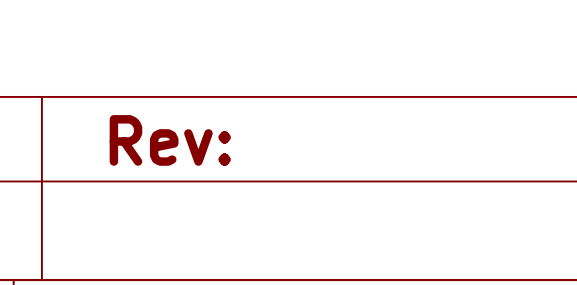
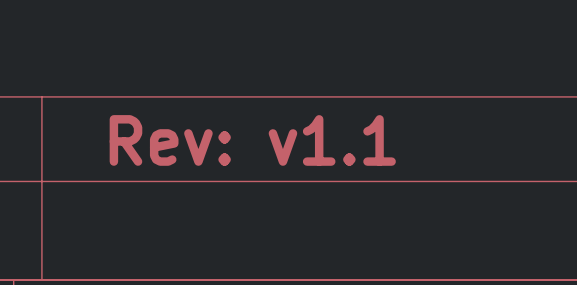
title block: Rev: (170, 140) -> Rev: v1.1 (252, 140)

